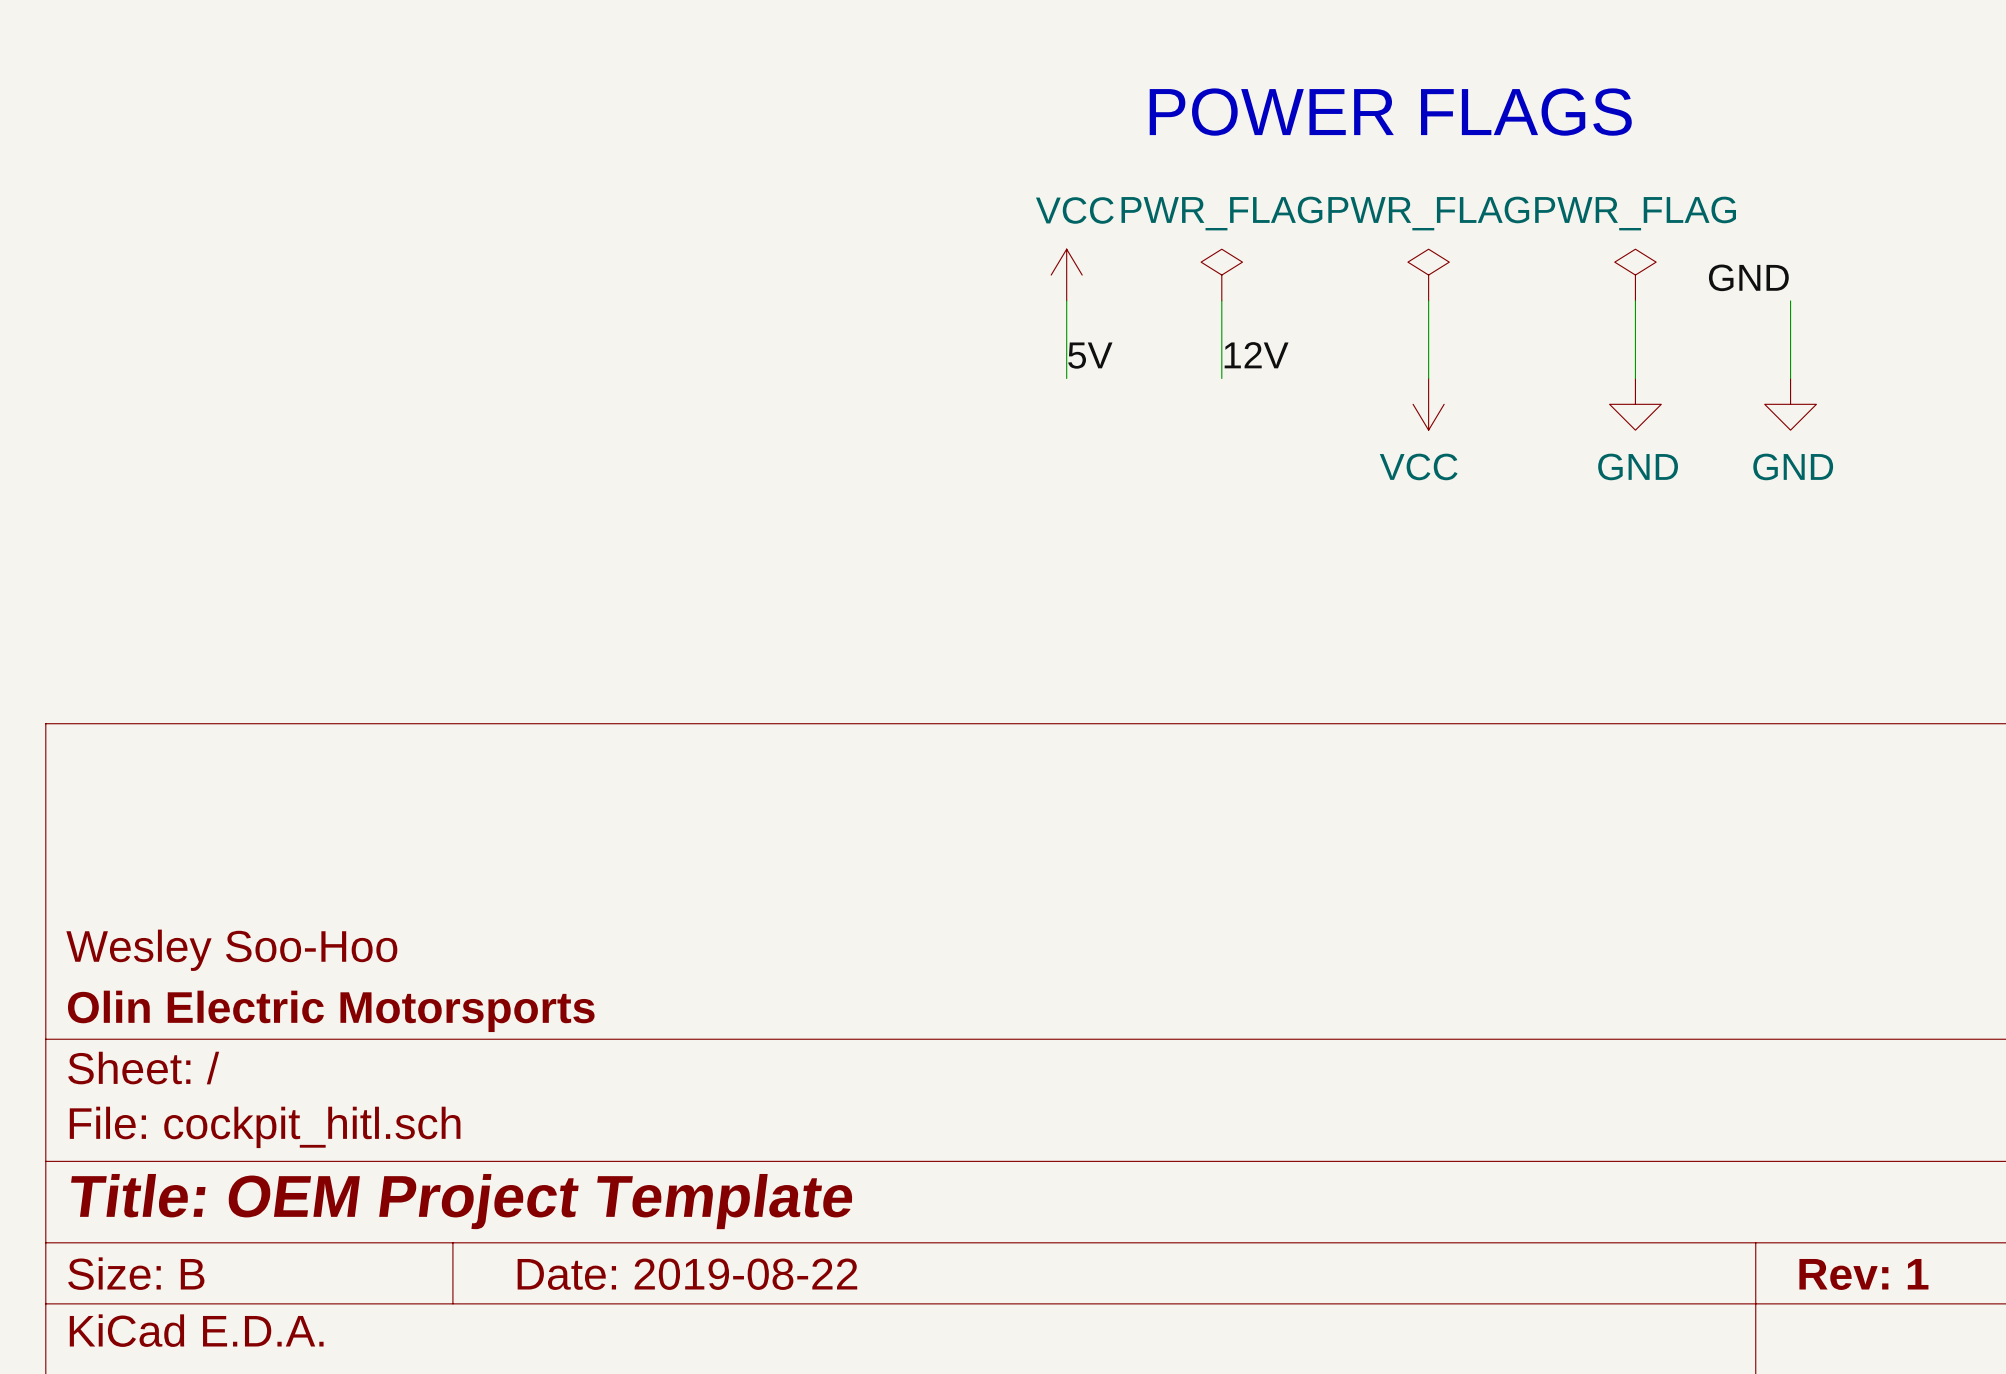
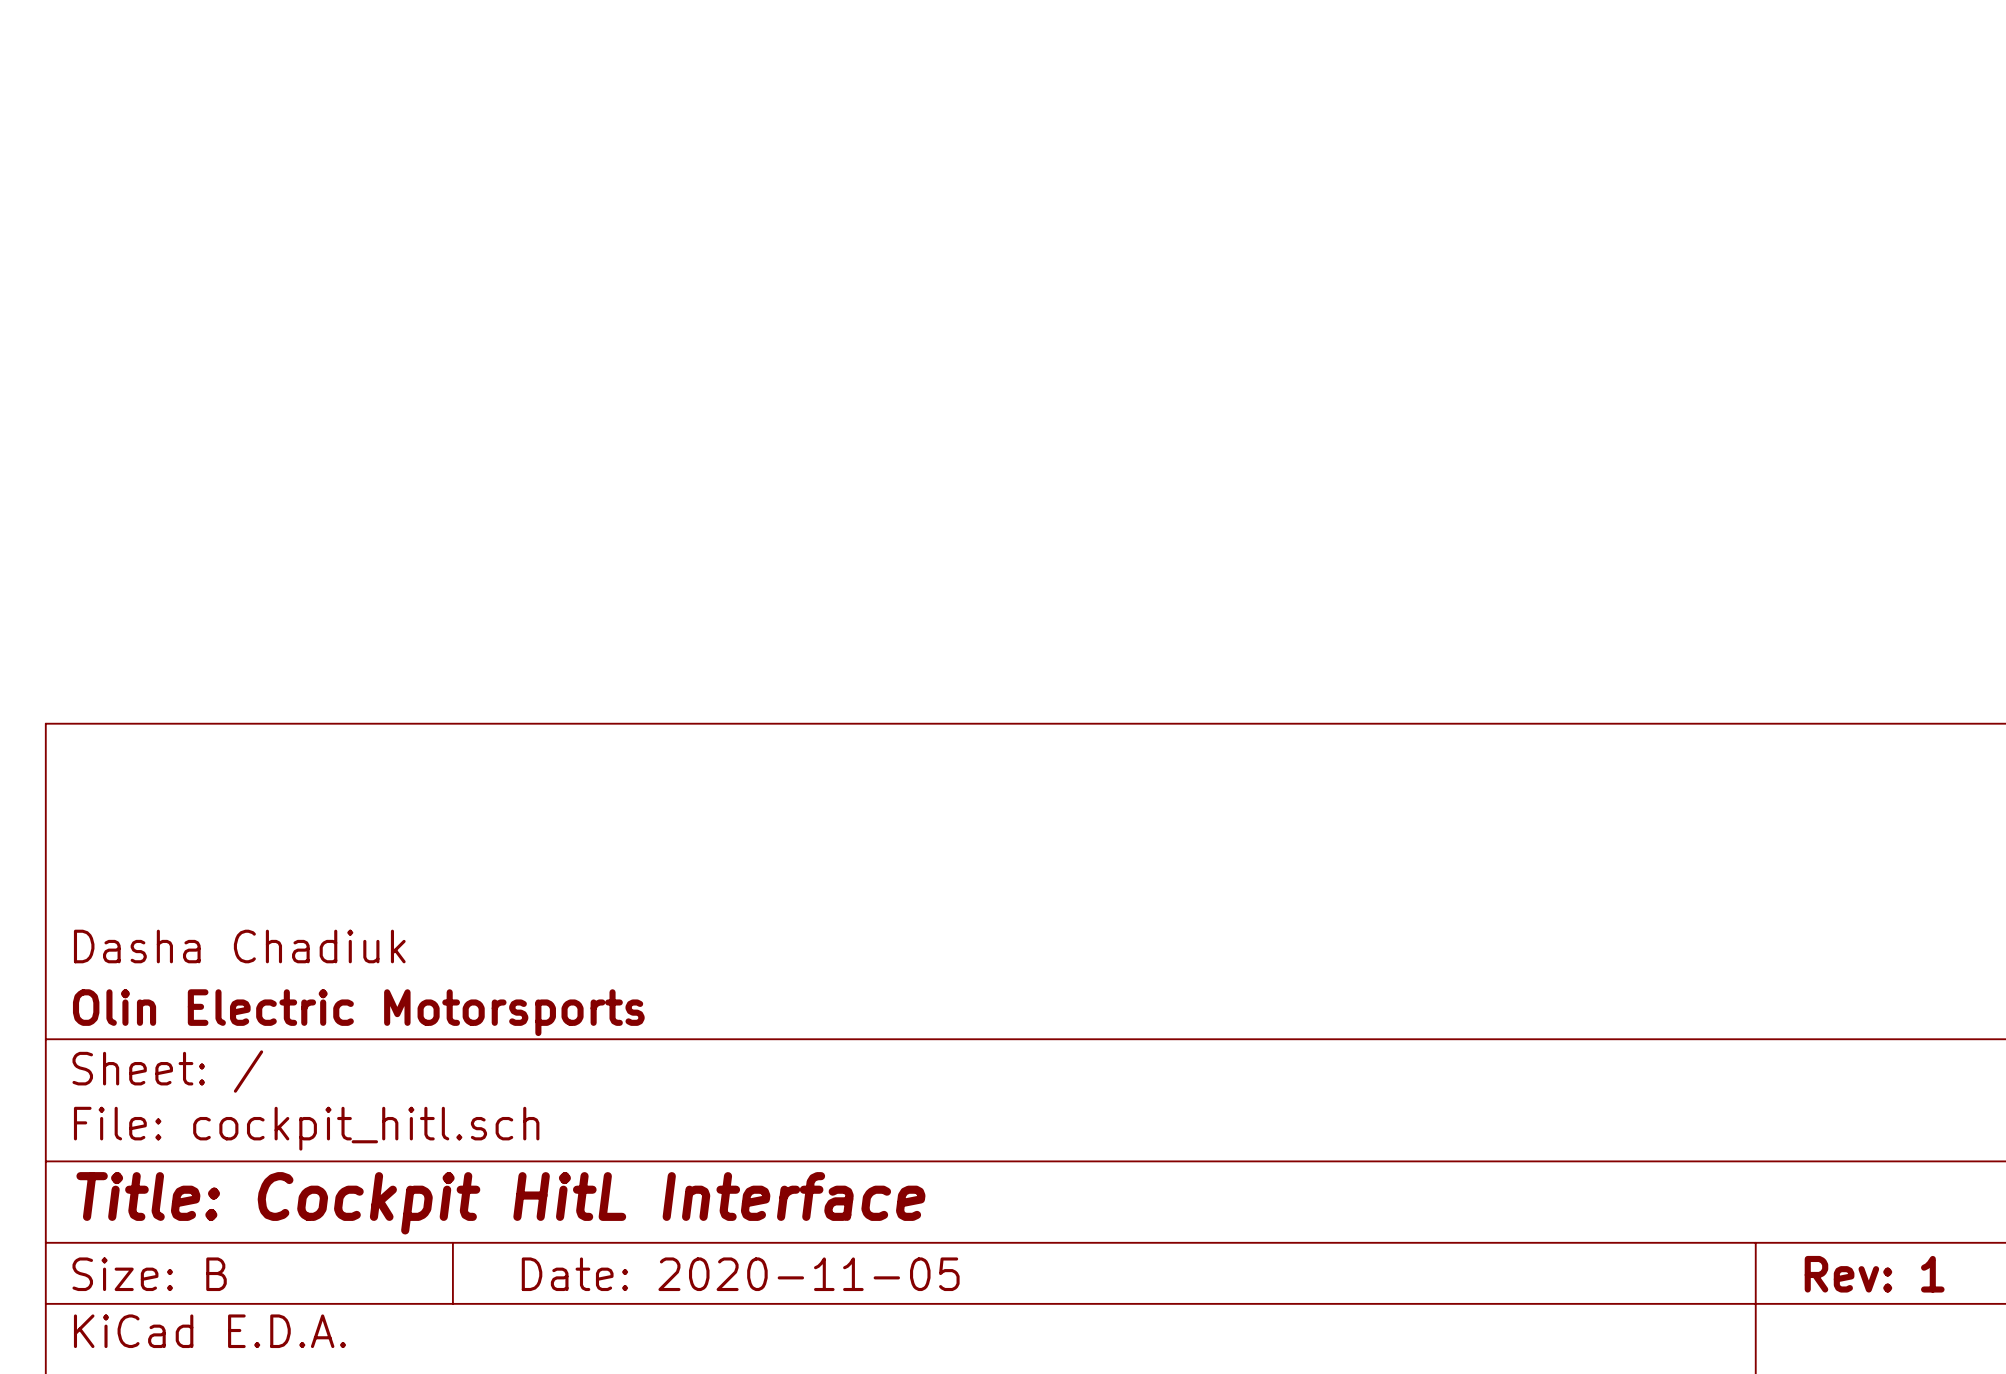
text: POWER FLAGS (1390, 112) -> none
power symbol: VCC (1066, 275) -> none
power symbol: PWR_FLAG (1221, 275) -> none
power symbol: PWR_FLAG (1428, 275) -> none
power symbol: PWR_FLAG (1635, 275) -> none
label: GND (1748, 277) -> none
wire: (1066, 300) (1066, 378) -> none
wire: (1221, 300) (1221, 378) -> none
wire: (1428, 300) (1428, 378) -> none
wire: (1635, 300) (1635, 378) -> none
wire: (1790, 300) (1790, 378) -> none
label: 5V (1090, 355) -> none
label: 12V (1256, 355) -> none
power symbol: VCC (1428, 404) -> none
power symbol: GND (1635, 404) -> none
power symbol: GND (1790, 404) -> none
title block: Wesley Soo-Hoo (231, 950) -> Dasha Chadiuk (239, 946)
title block: Title: OEM Project Template (462, 1201) -> Title: Cockpit HitL Interface (500, 1203)
title block: Date: 2019-08-22 (687, 1274) -> Date: 2020-11-05 (740, 1274)

